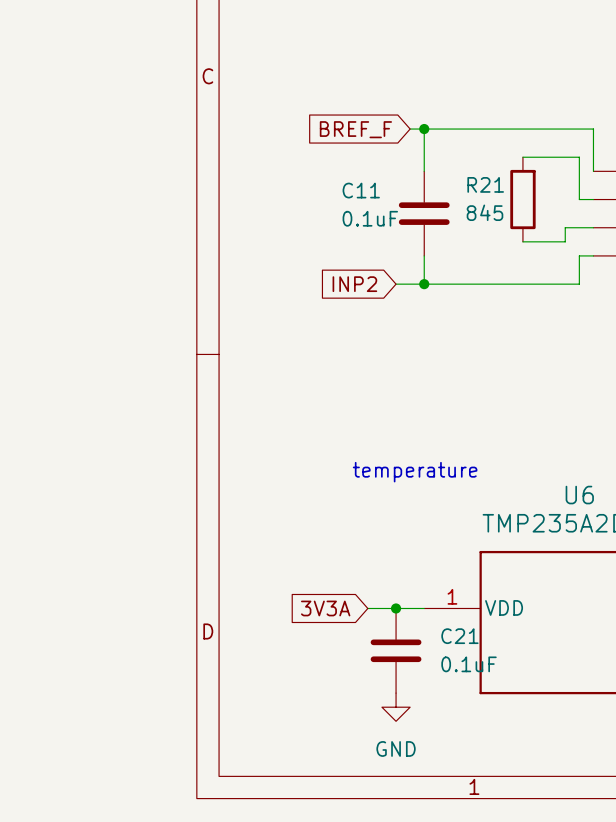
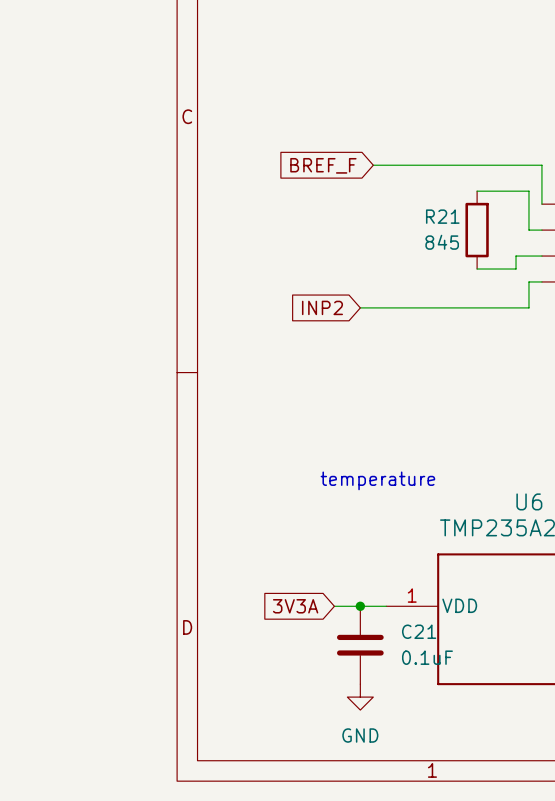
wire: (424, 129) (424, 171) -> none
junction: (424, 129) -> none
C11: 0.1uF (424, 213) -> none
wire: (424, 255) (424, 284) -> none
junction: (424, 284) -> none

